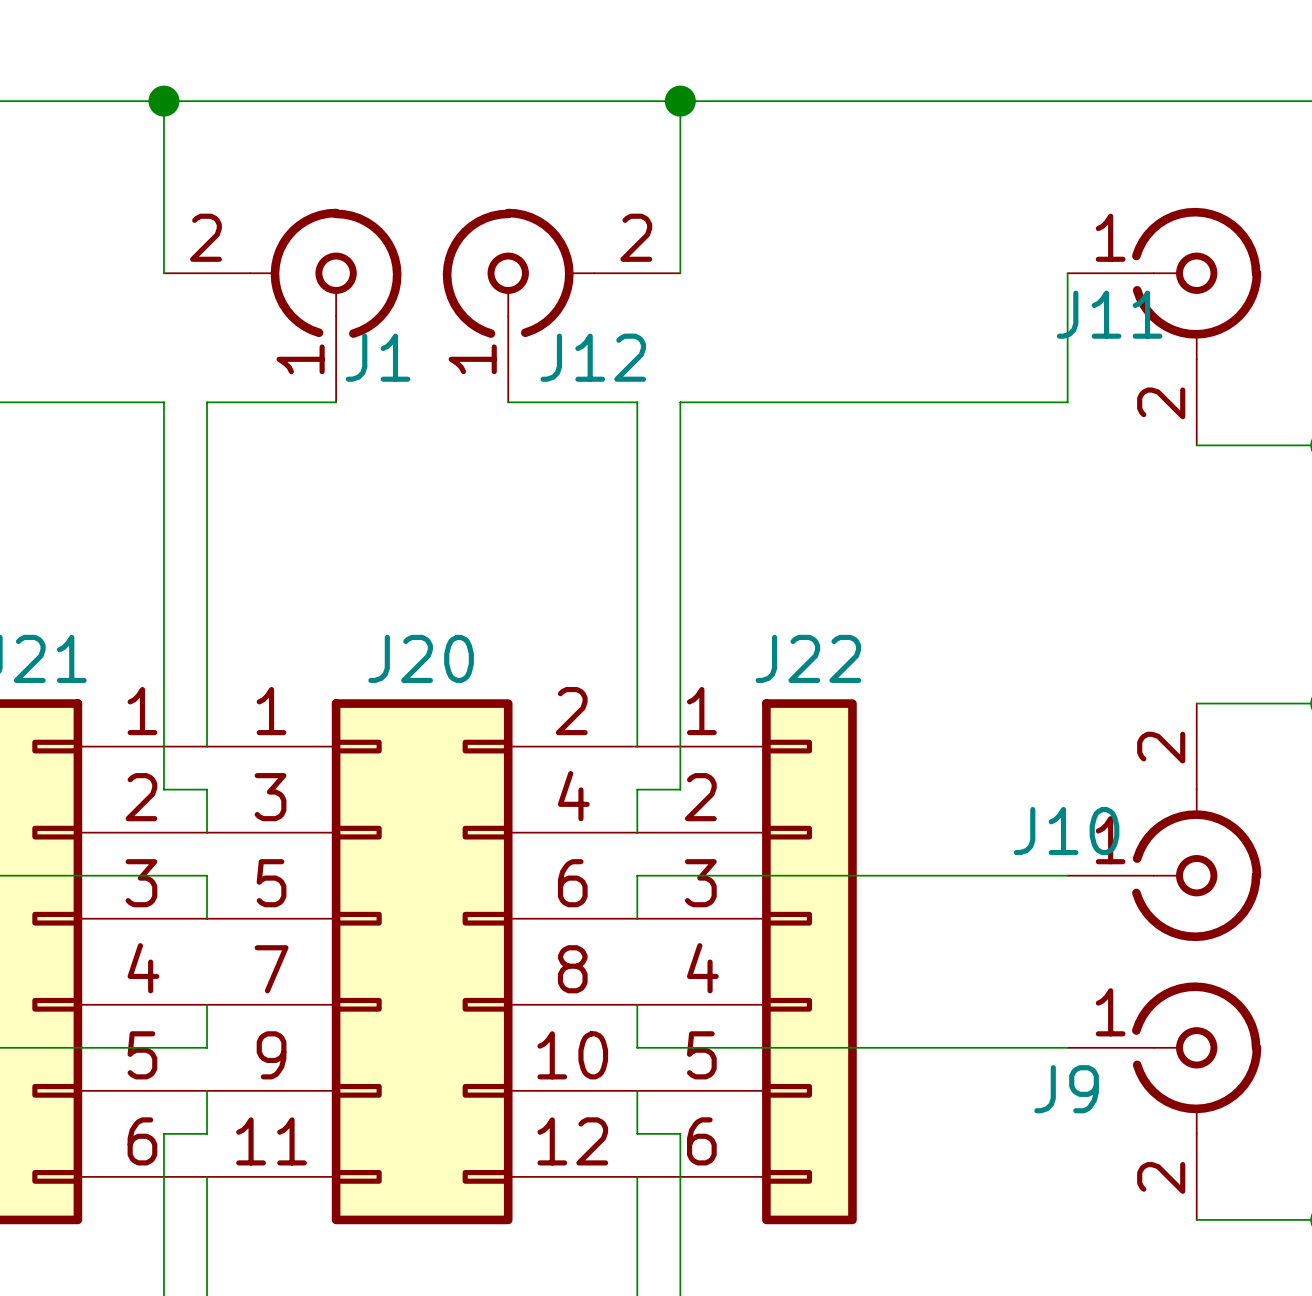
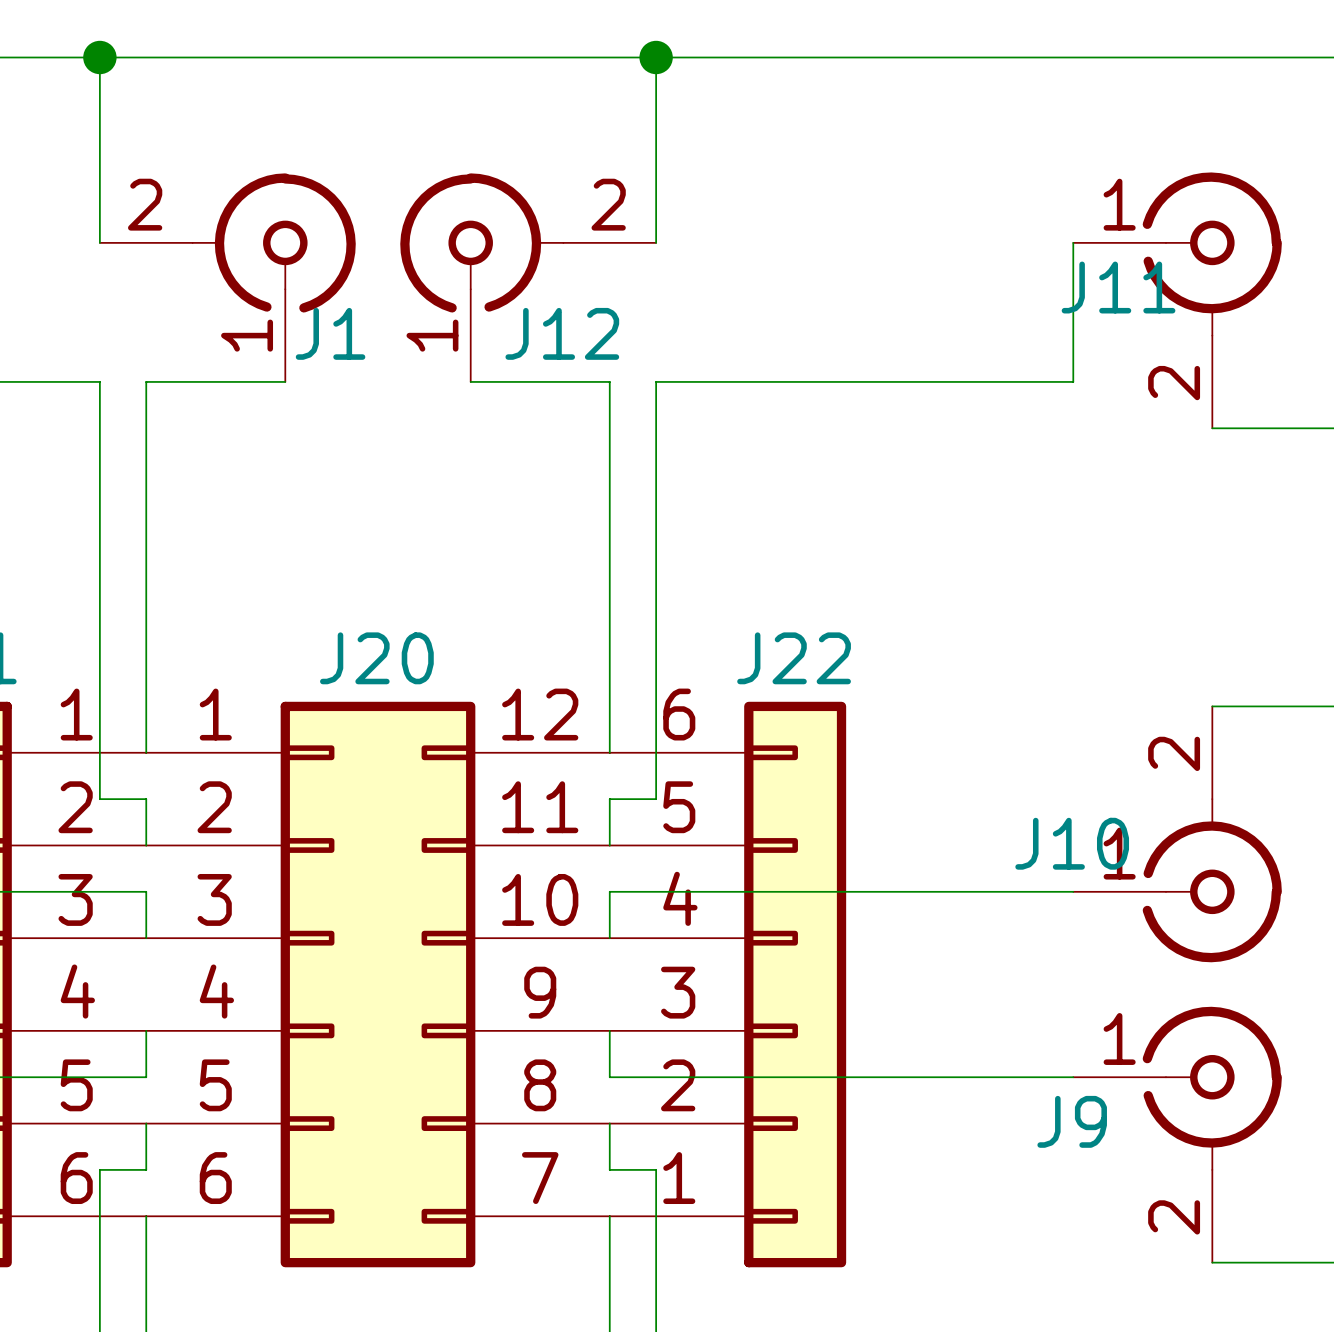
J20 symbol: [207, 699, 638, 1225] -> [146, 701, 610, 1268]
J22 flip: as is (809, 961) -> up-down (795, 984)

